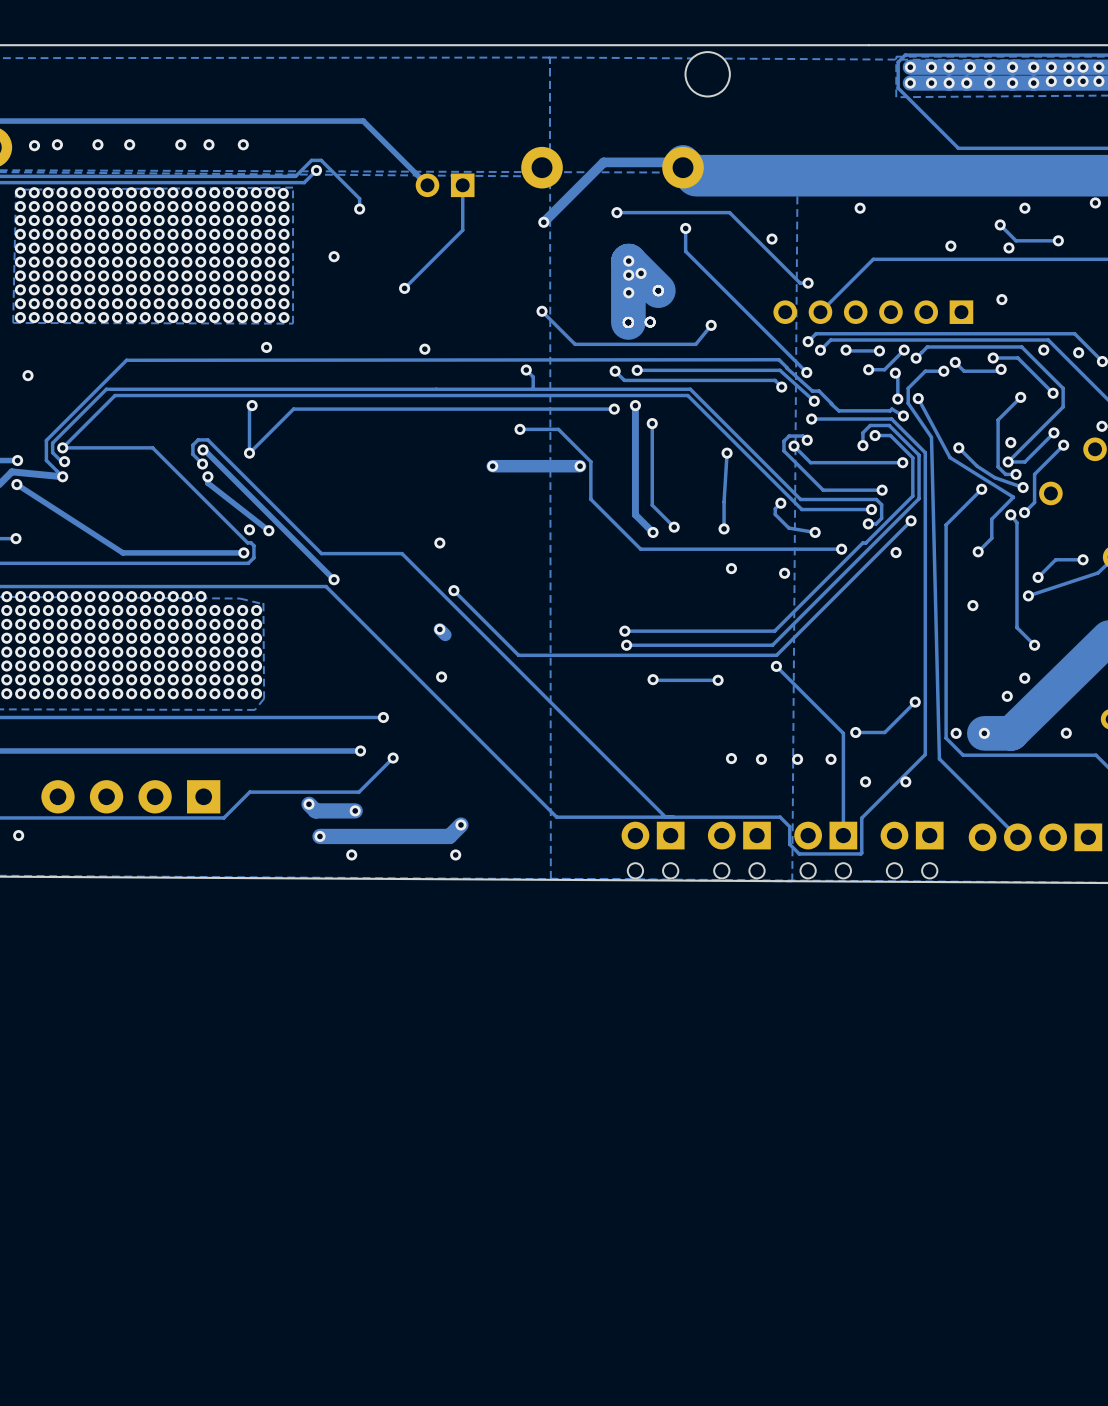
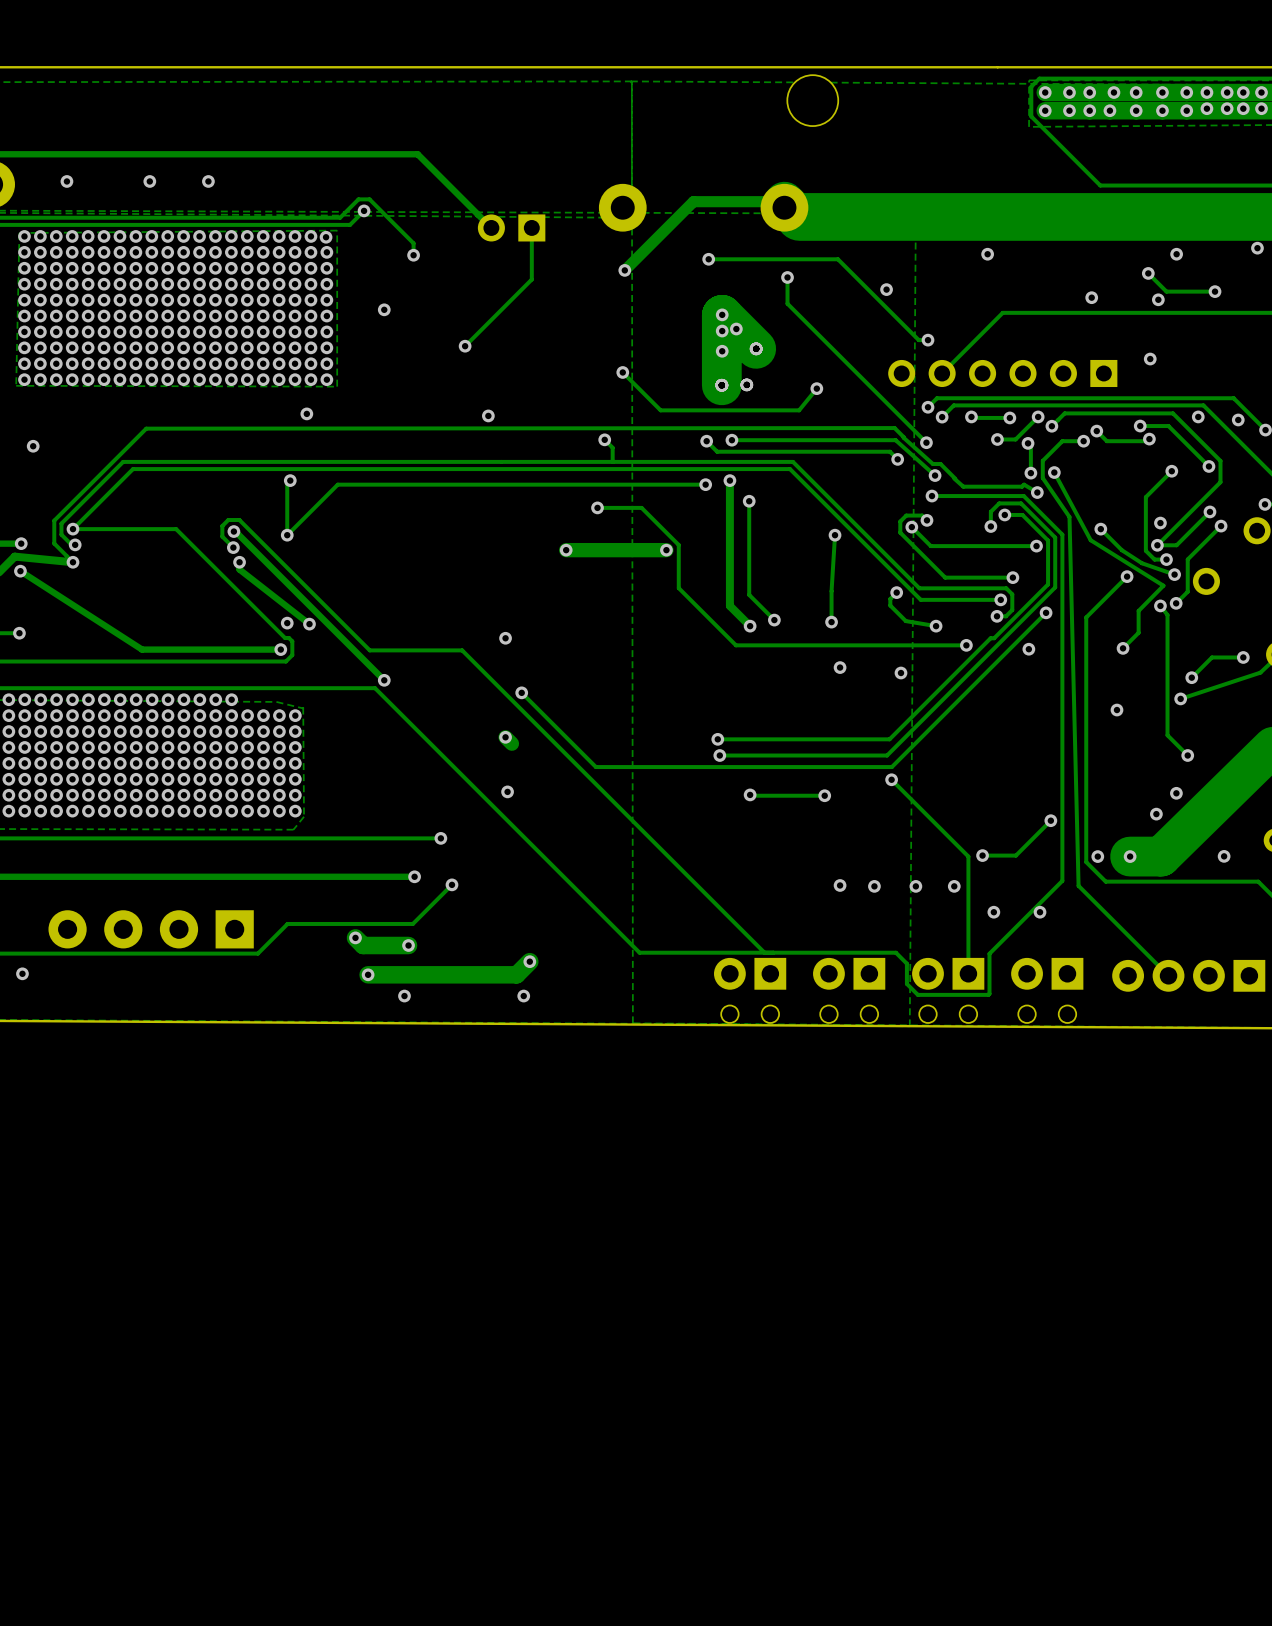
via: (97, 144) -> none
via: (208, 144) -> none
via: (243, 144) -> none
via: (34, 145) -> none

